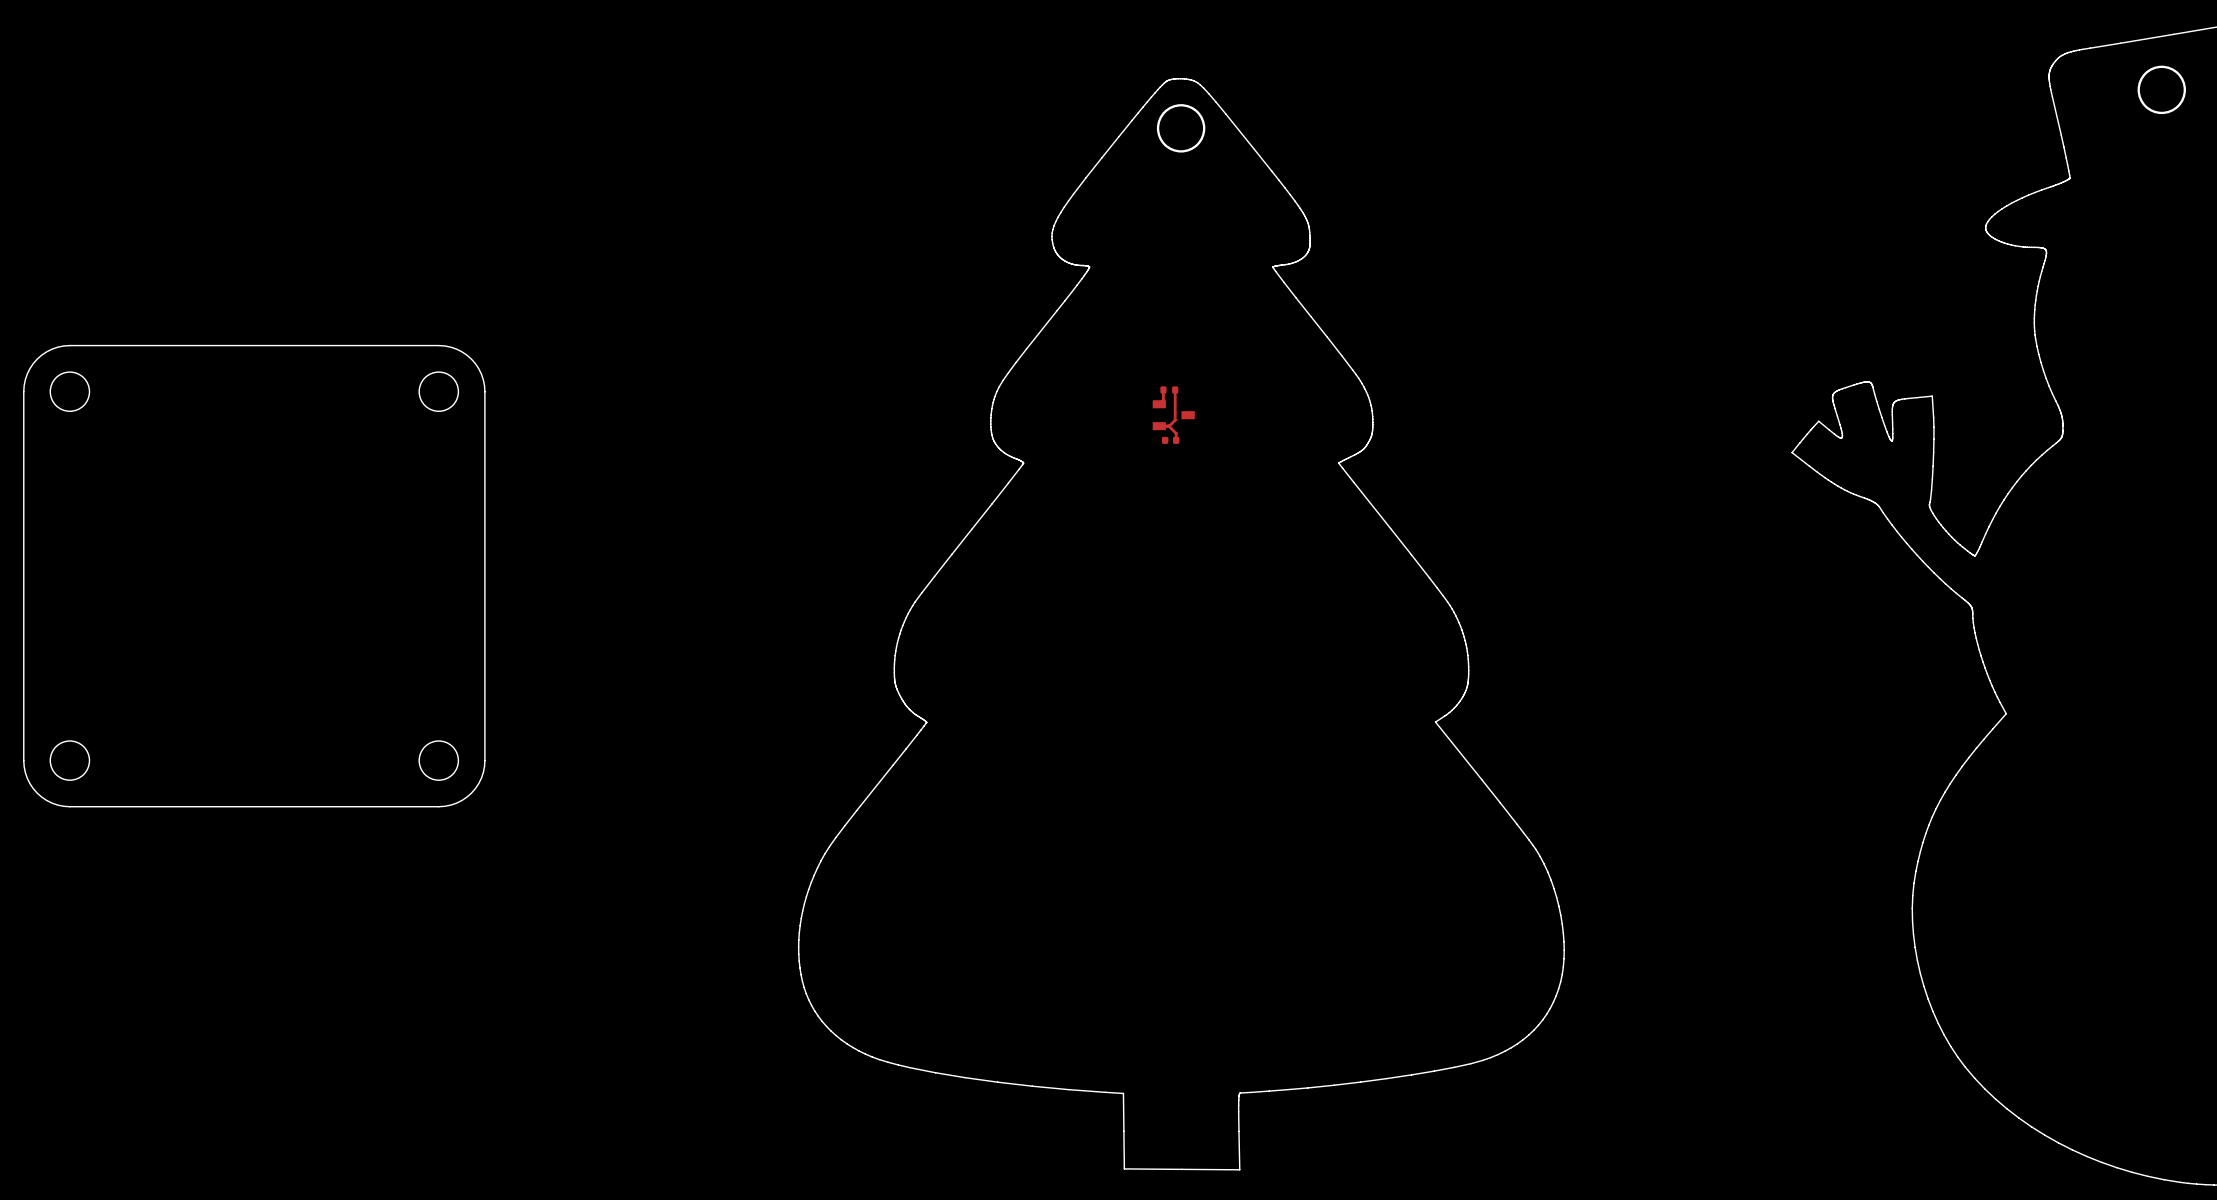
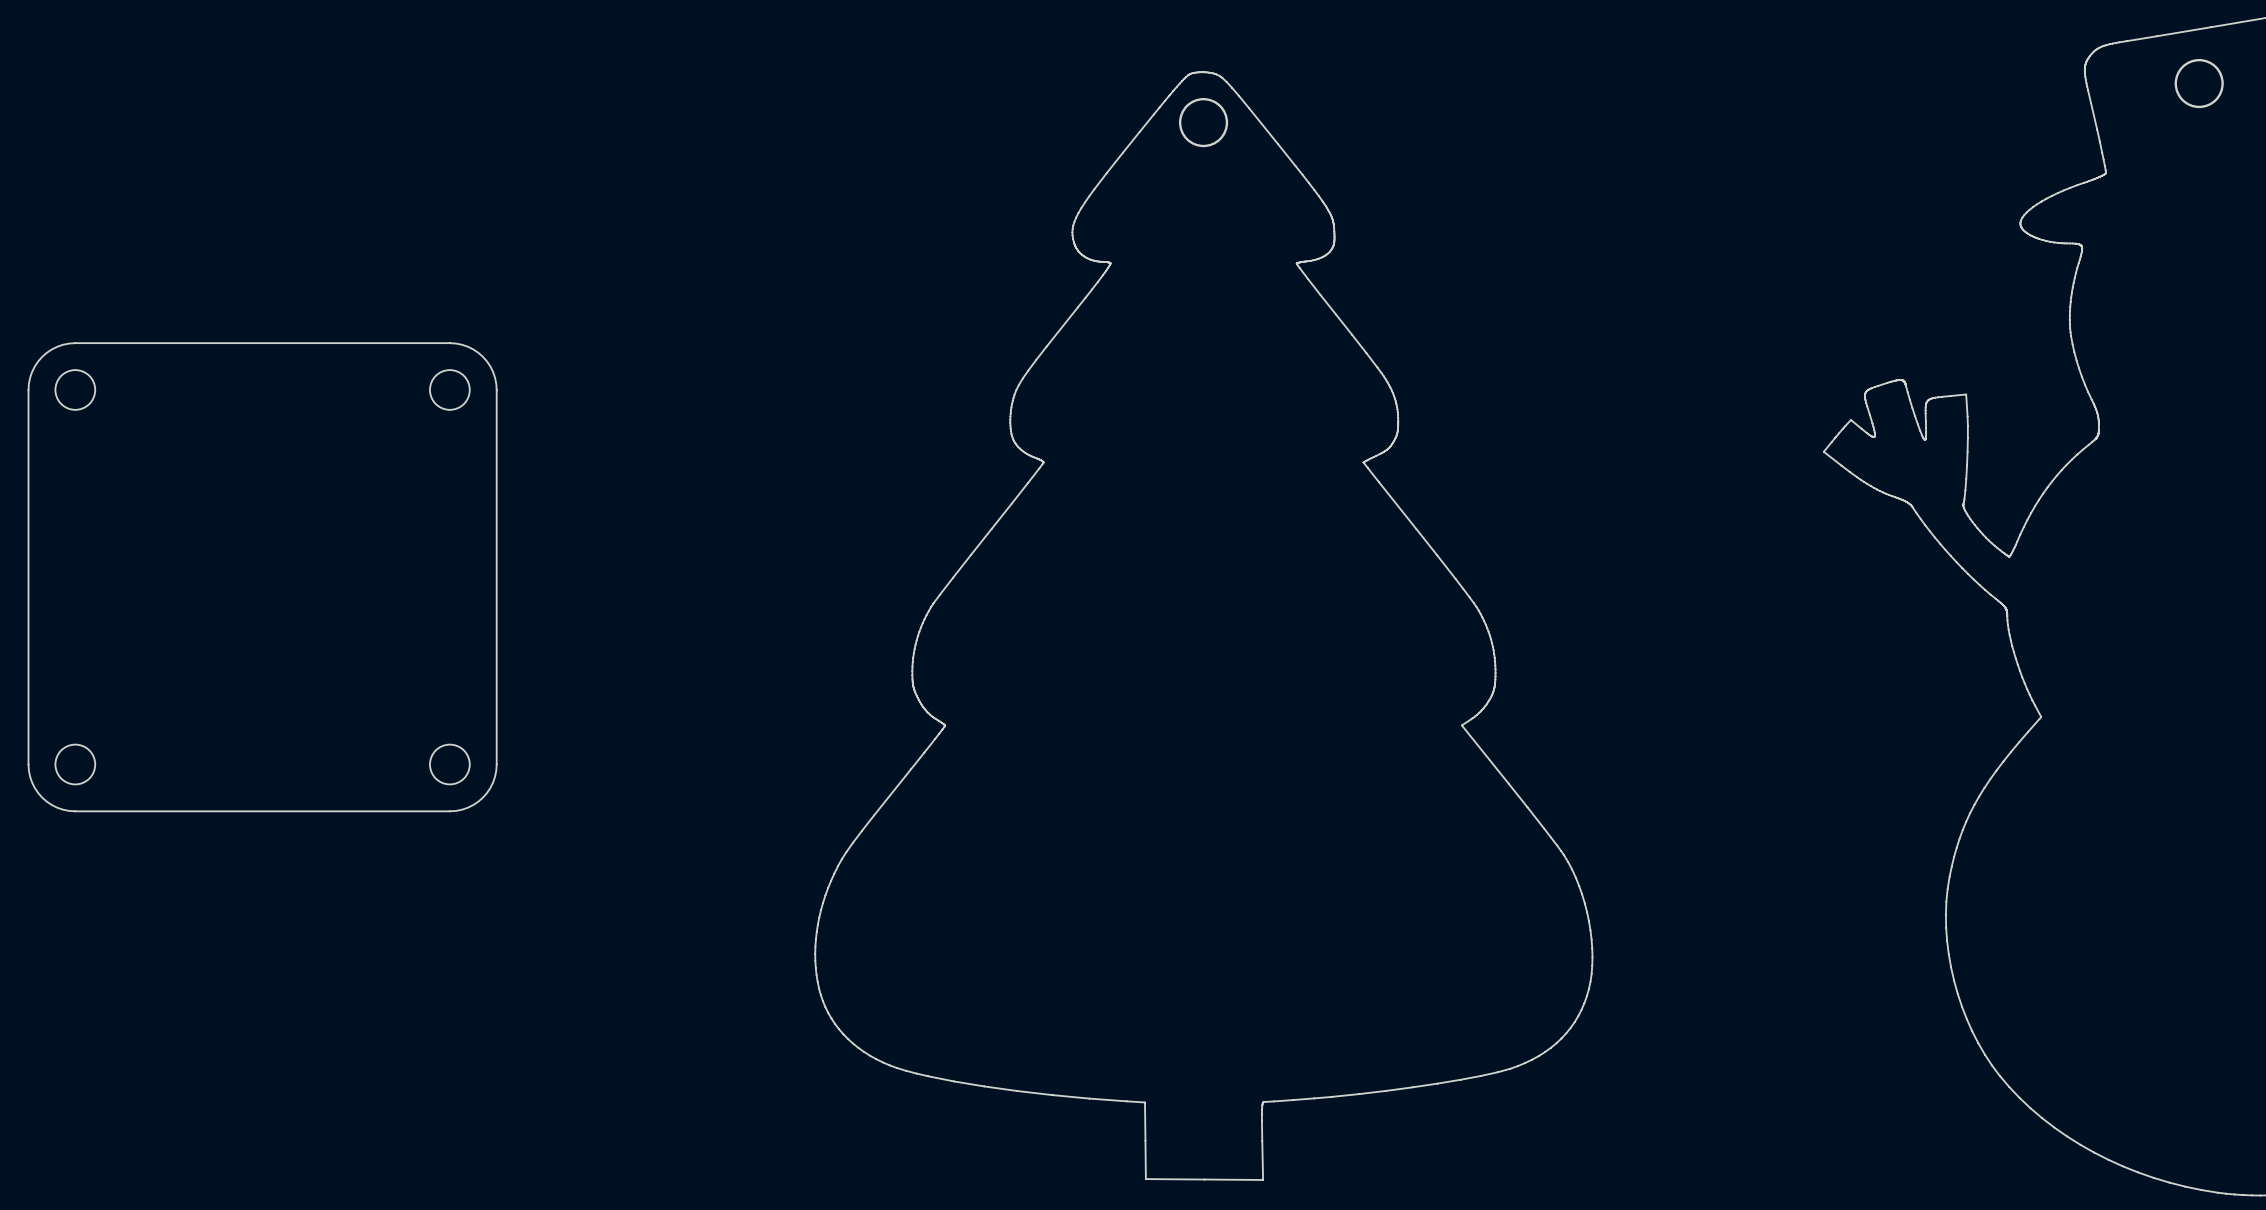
top track: (1163, 390) (1163, 400) (1159, 404) -> none
part: (1169, 390) -> none
top track: (1175, 390) (1175, 420) (1169, 426) (1159, 426) -> none
part: (1173, 415) -> none
top track: (1168, 426) (1176, 433) (1176, 440) -> none
part: (1170, 440) -> none

